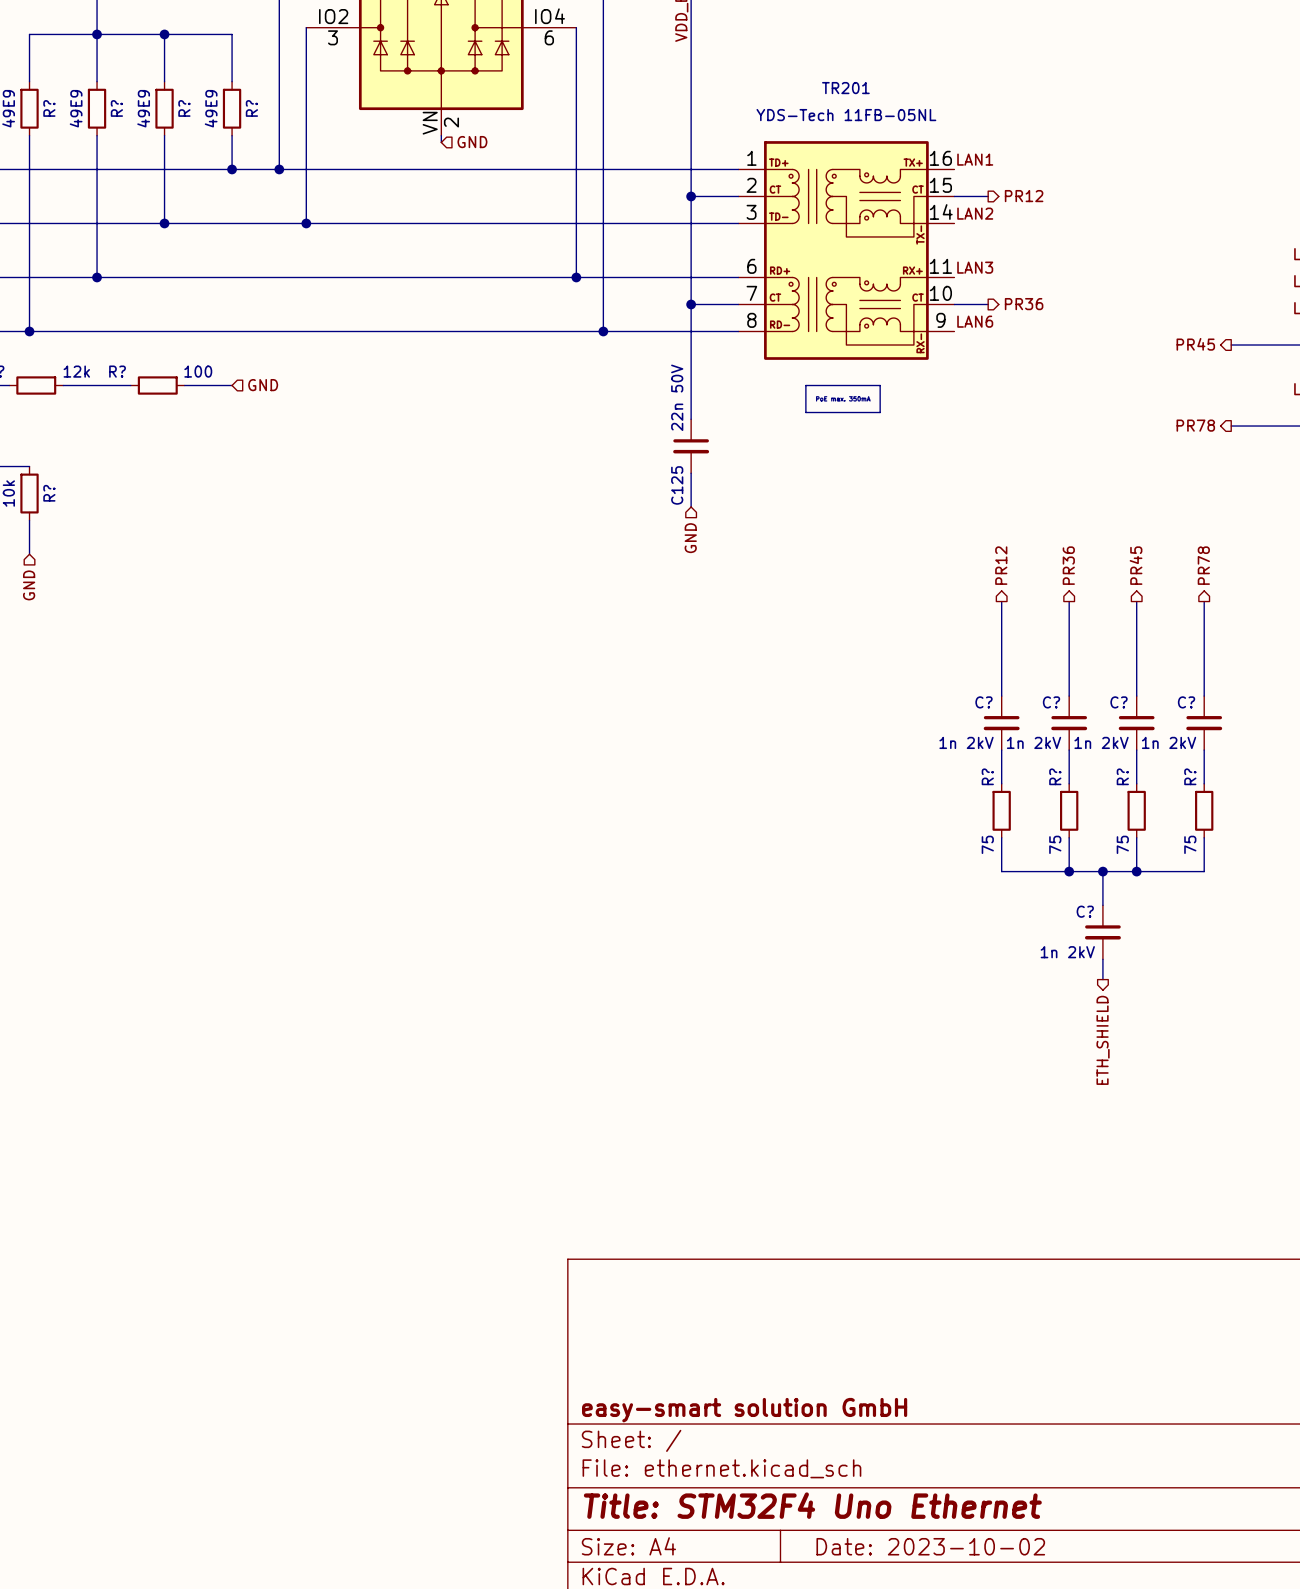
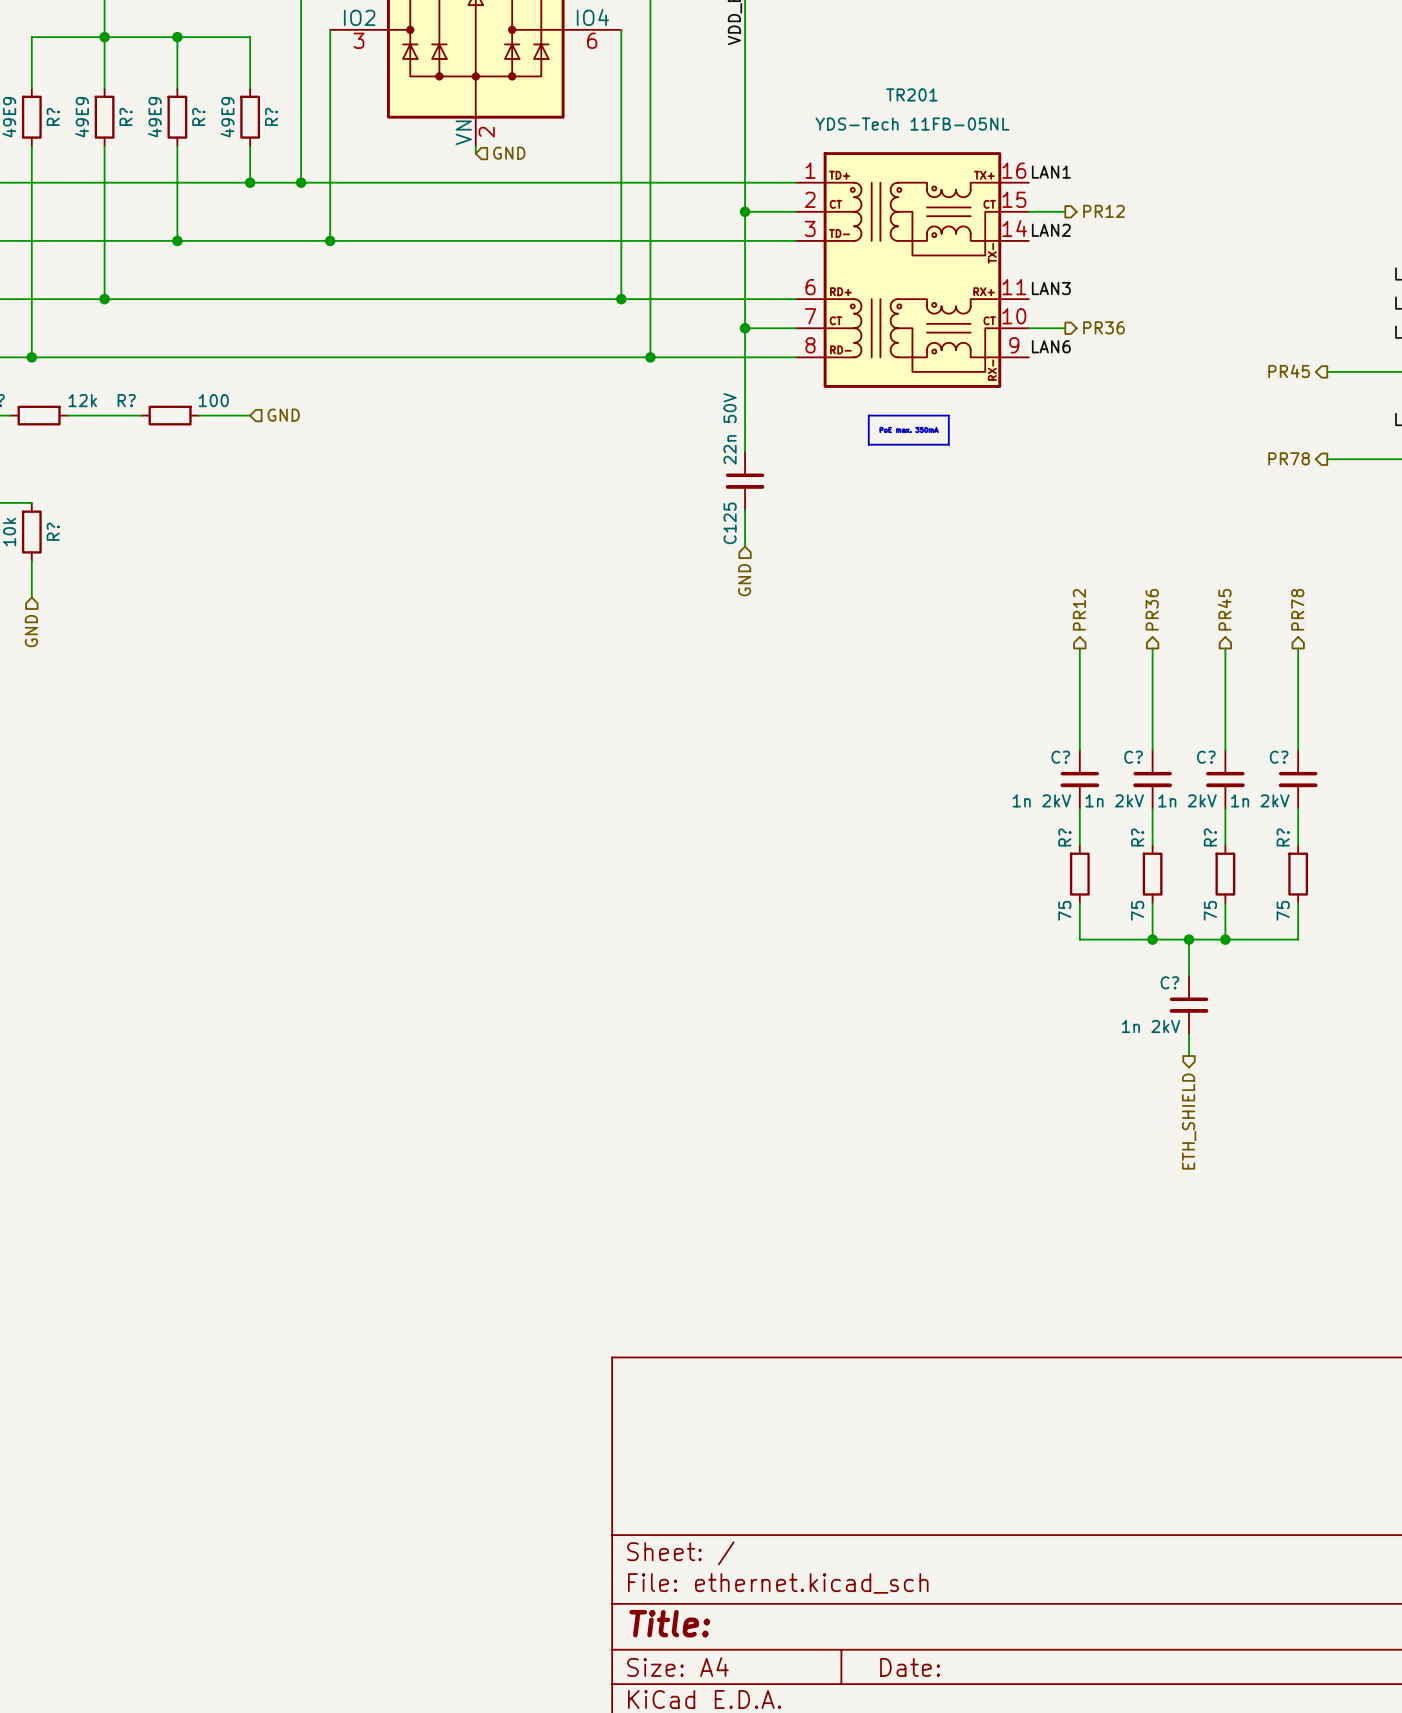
title block: easy-smart solution GmbH (744, 1410) -> none
title block: Title: STM32F4 Uno Ethernet (812, 1505) -> Title: (669, 1623)
title block: Date: 2023-10-02 (930, 1546) -> Date: (910, 1667)

